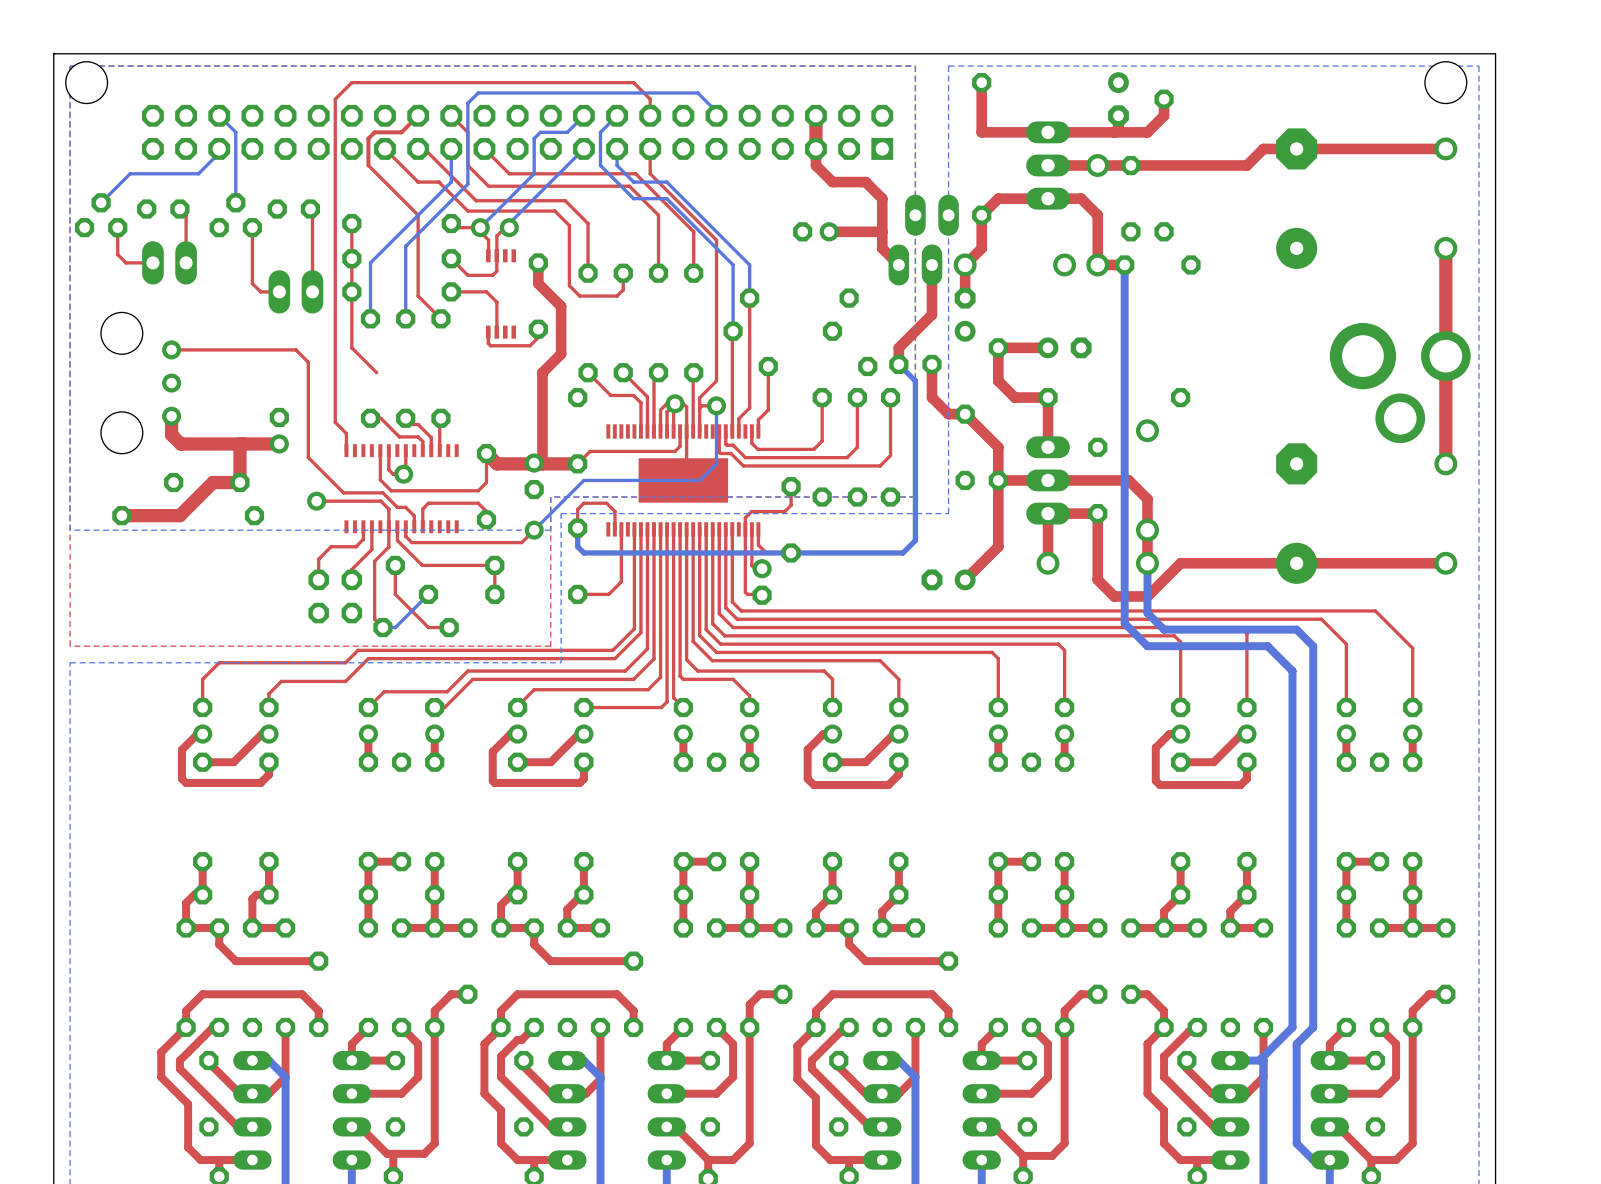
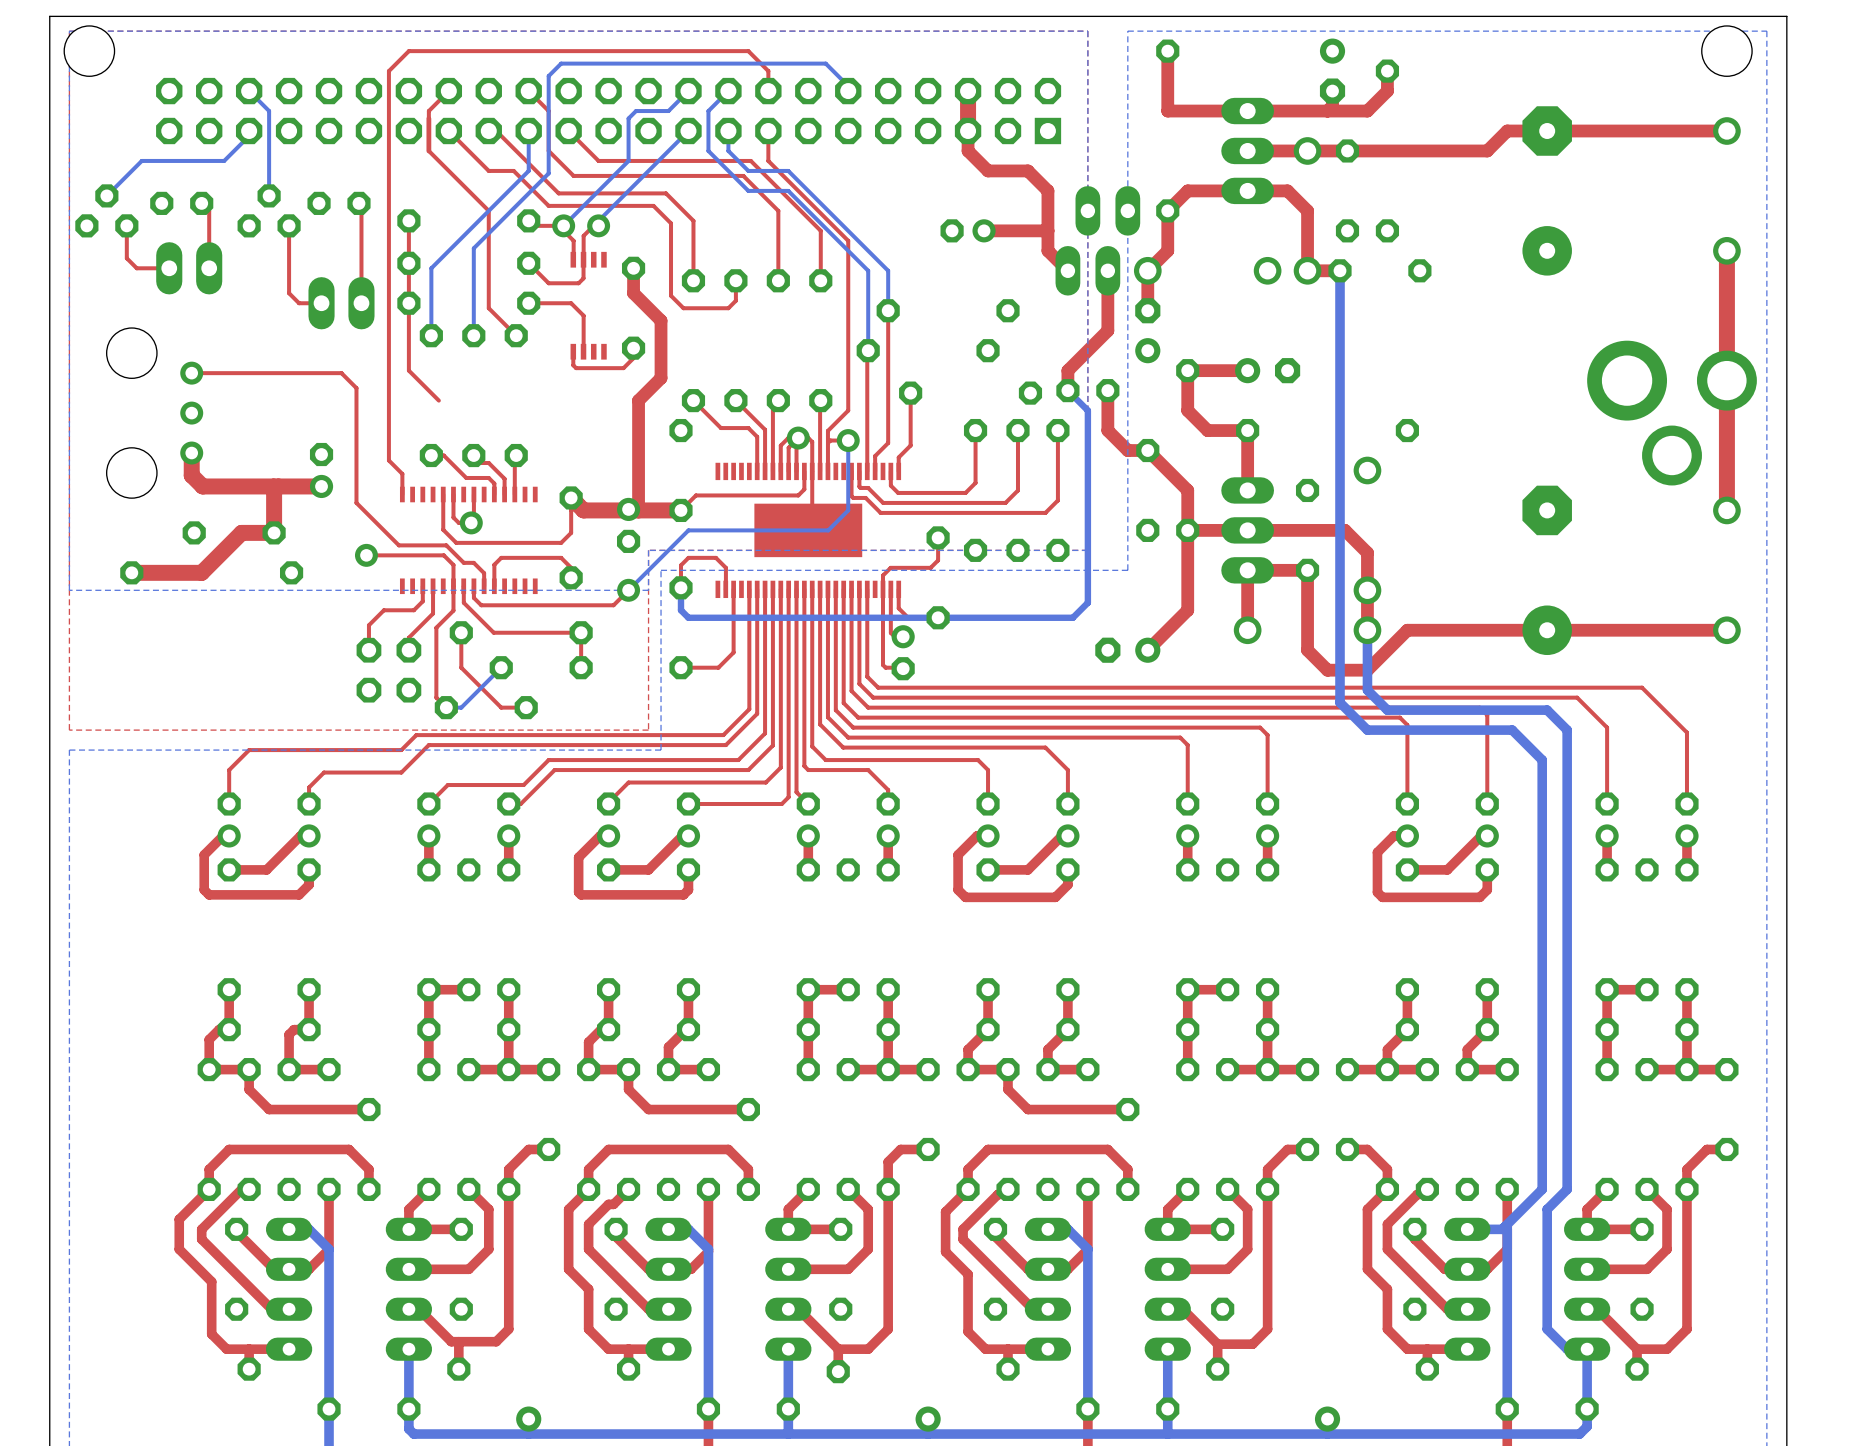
top track: (418, 115) (401, 132) (374, 132) (368, 138) -> (448, 91) (428, 111) (428, 118)

